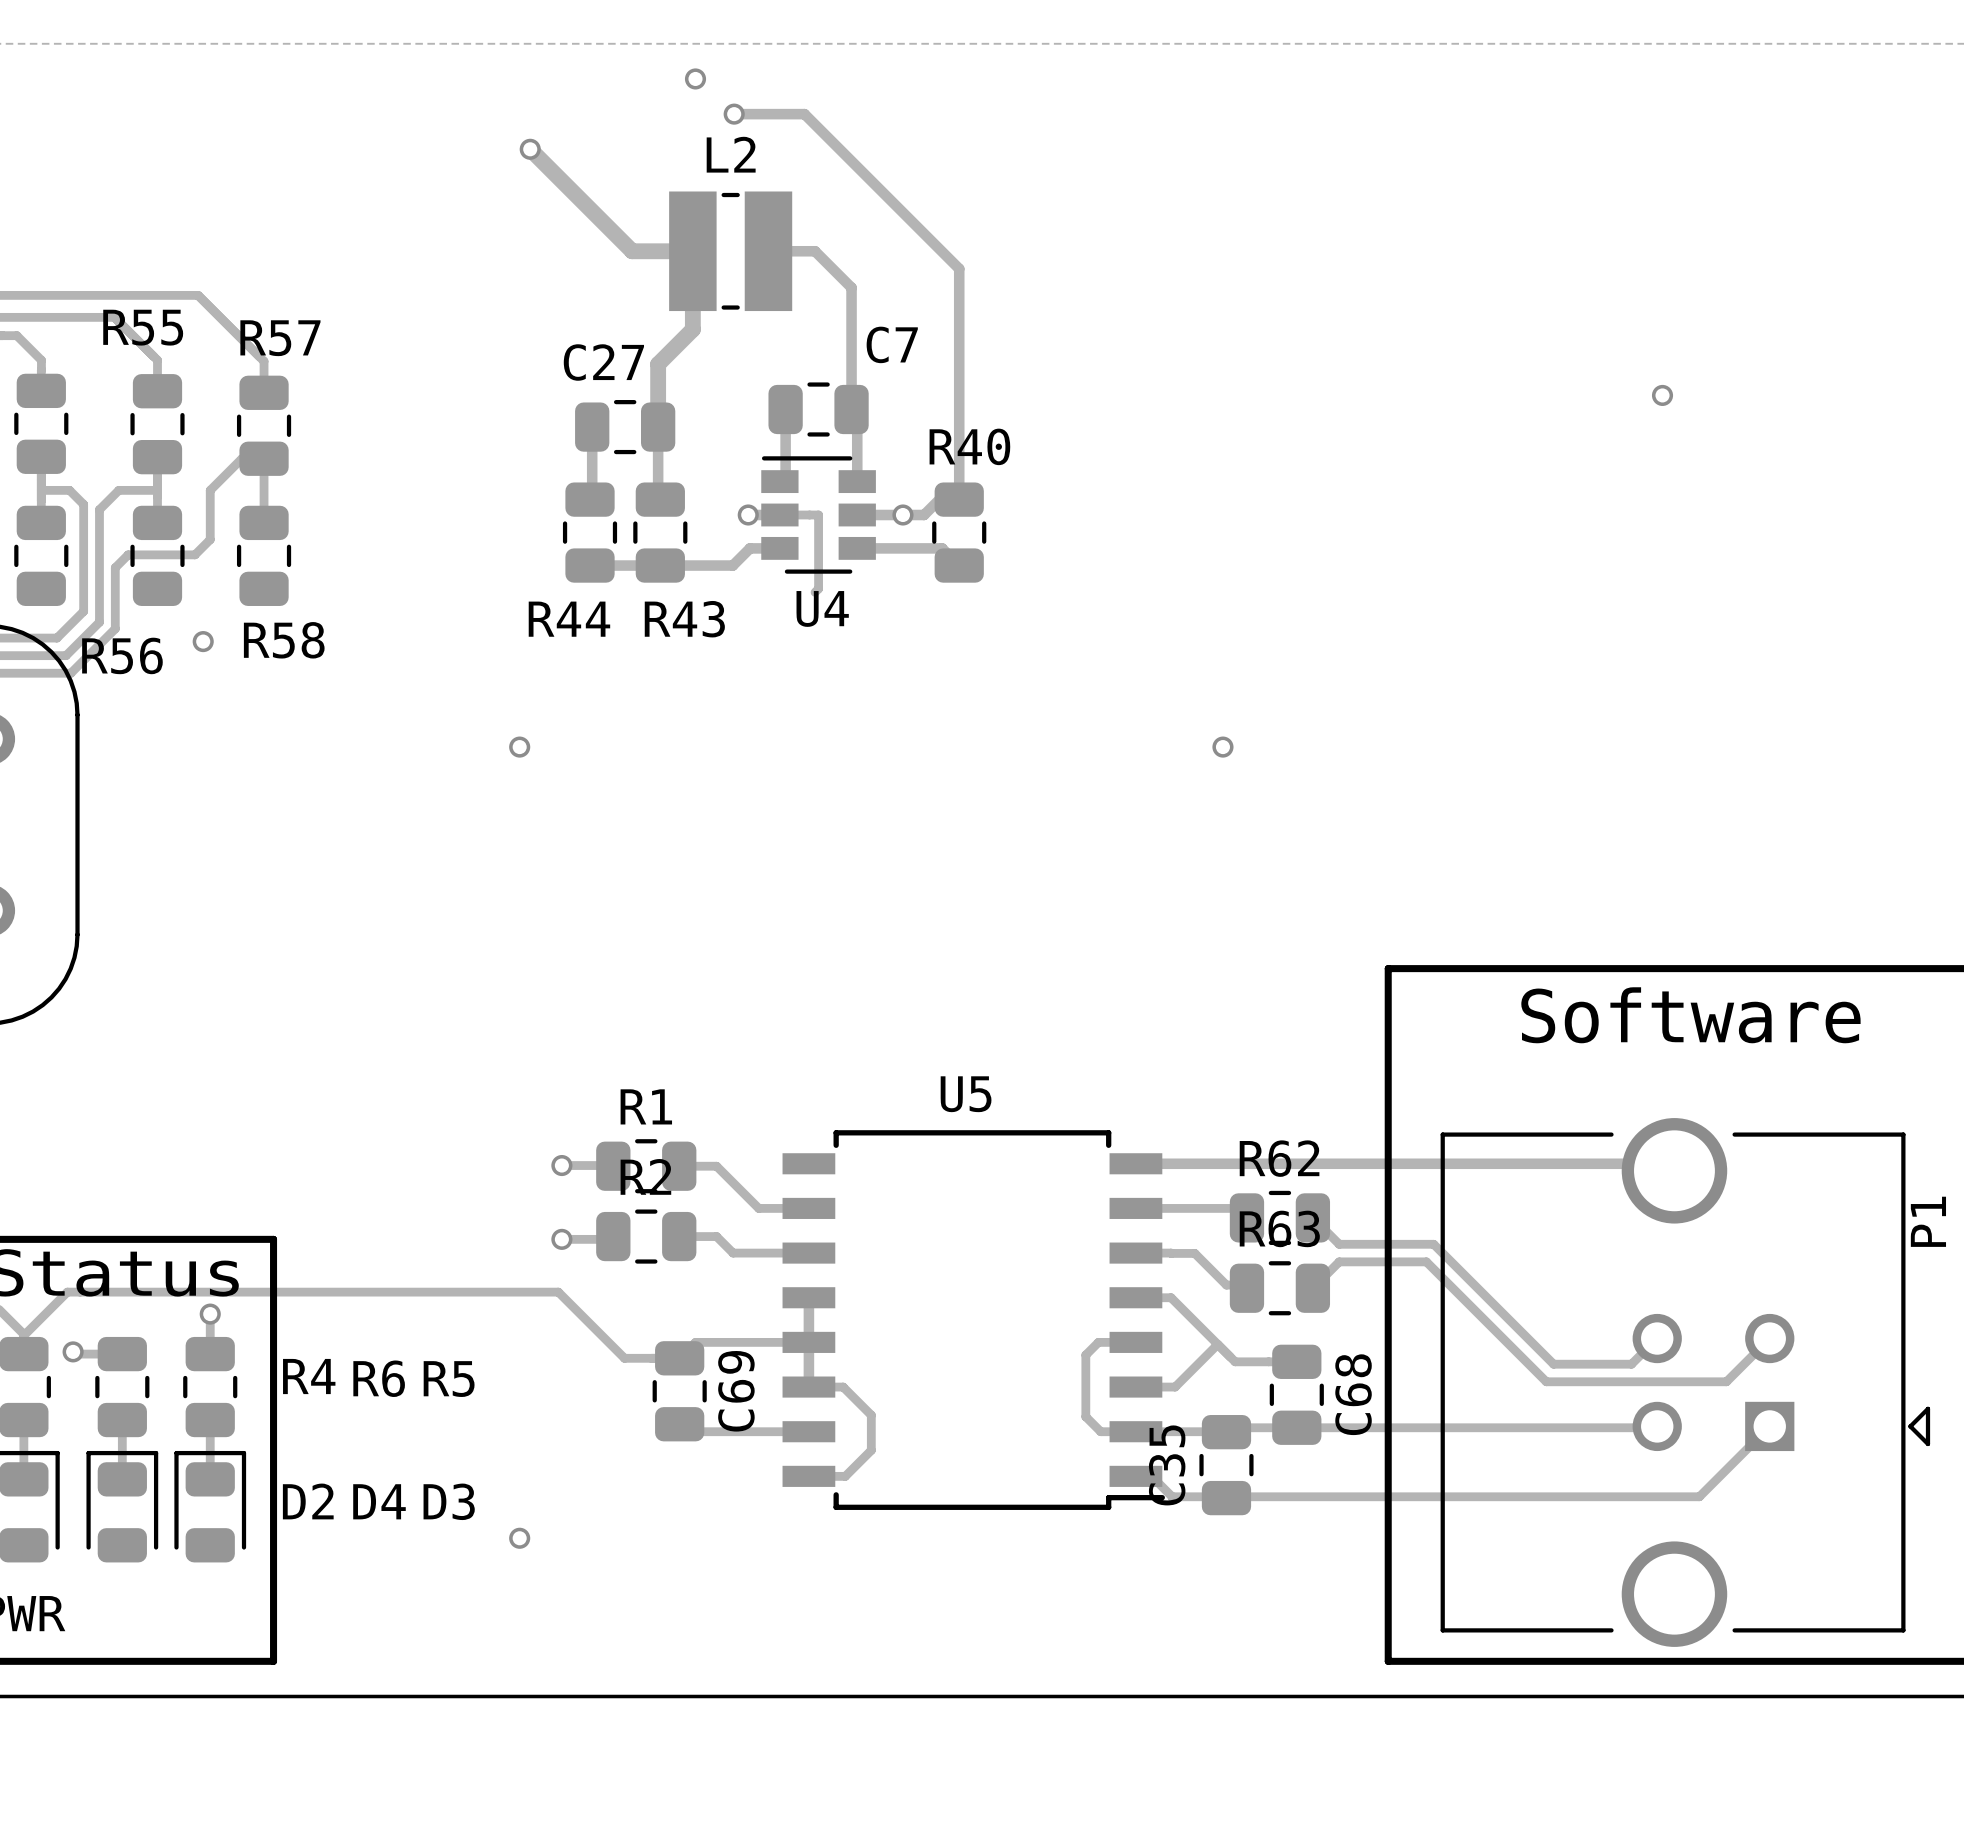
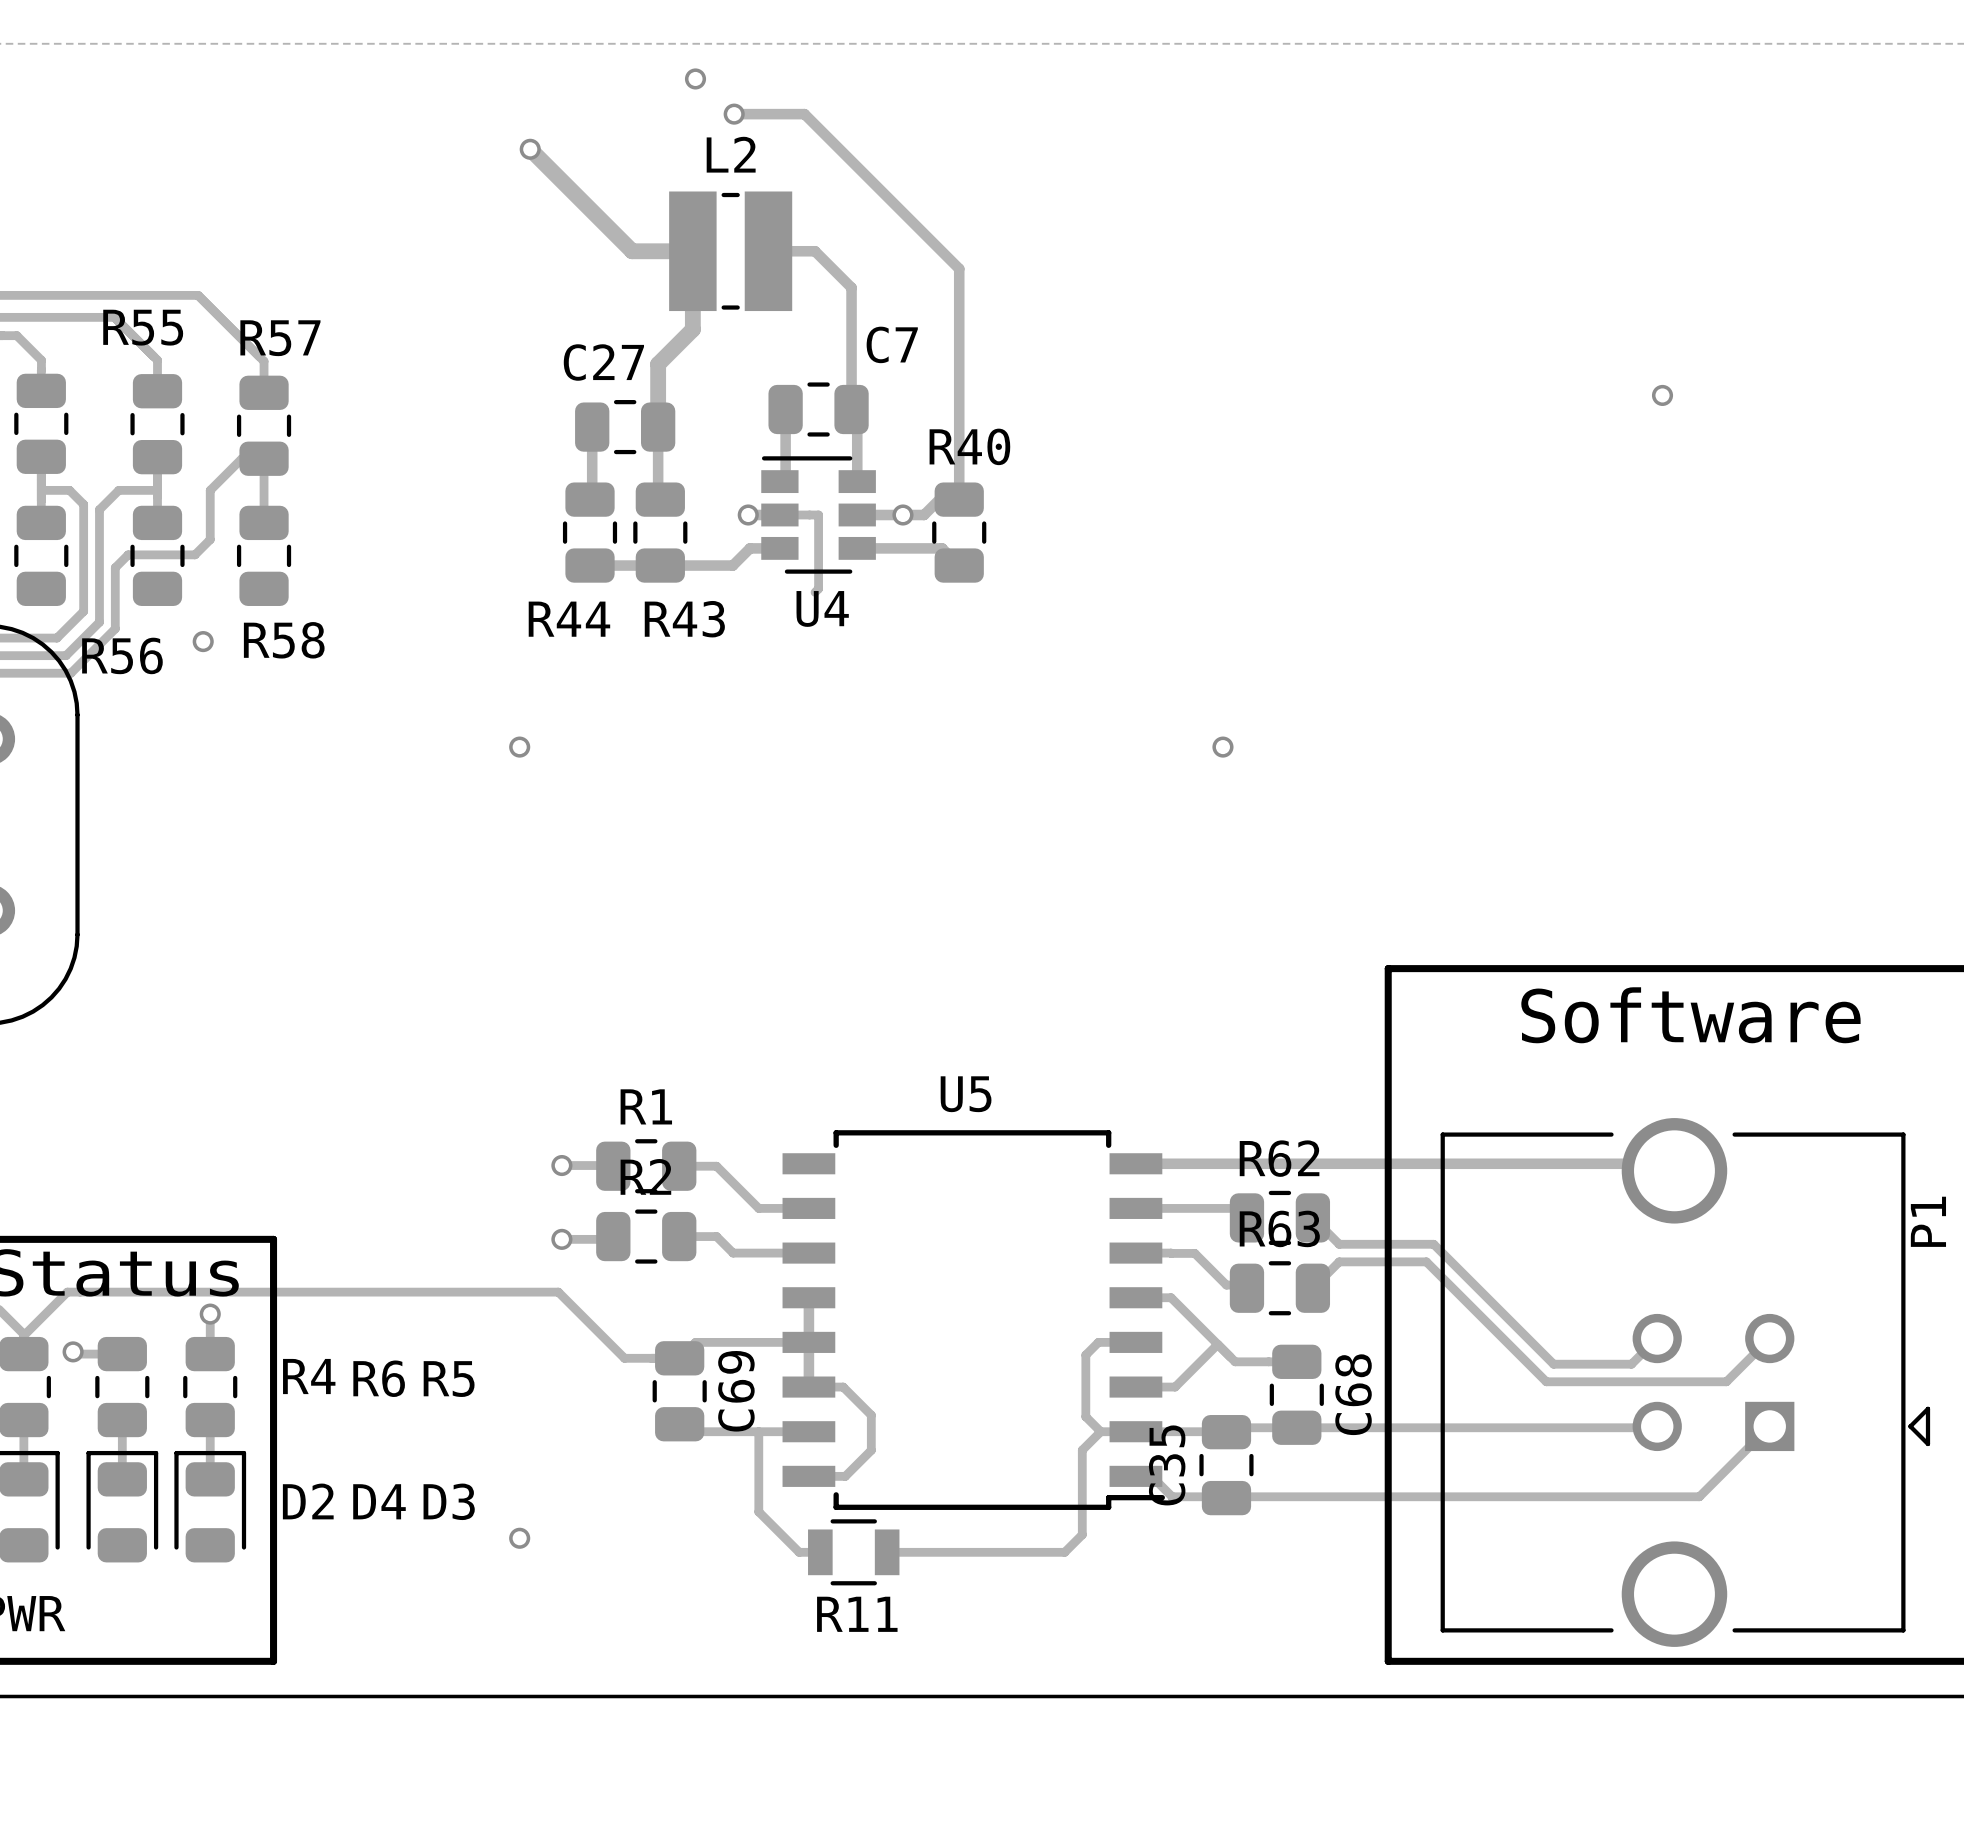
track: none -> (758, 1431) (758, 1511) (799, 1552) (820, 1552)
track: none -> (1100, 1431) (1082, 1450) (1082, 1534) (1064, 1552) (887, 1552)
R11: none -> (853, 1552)

